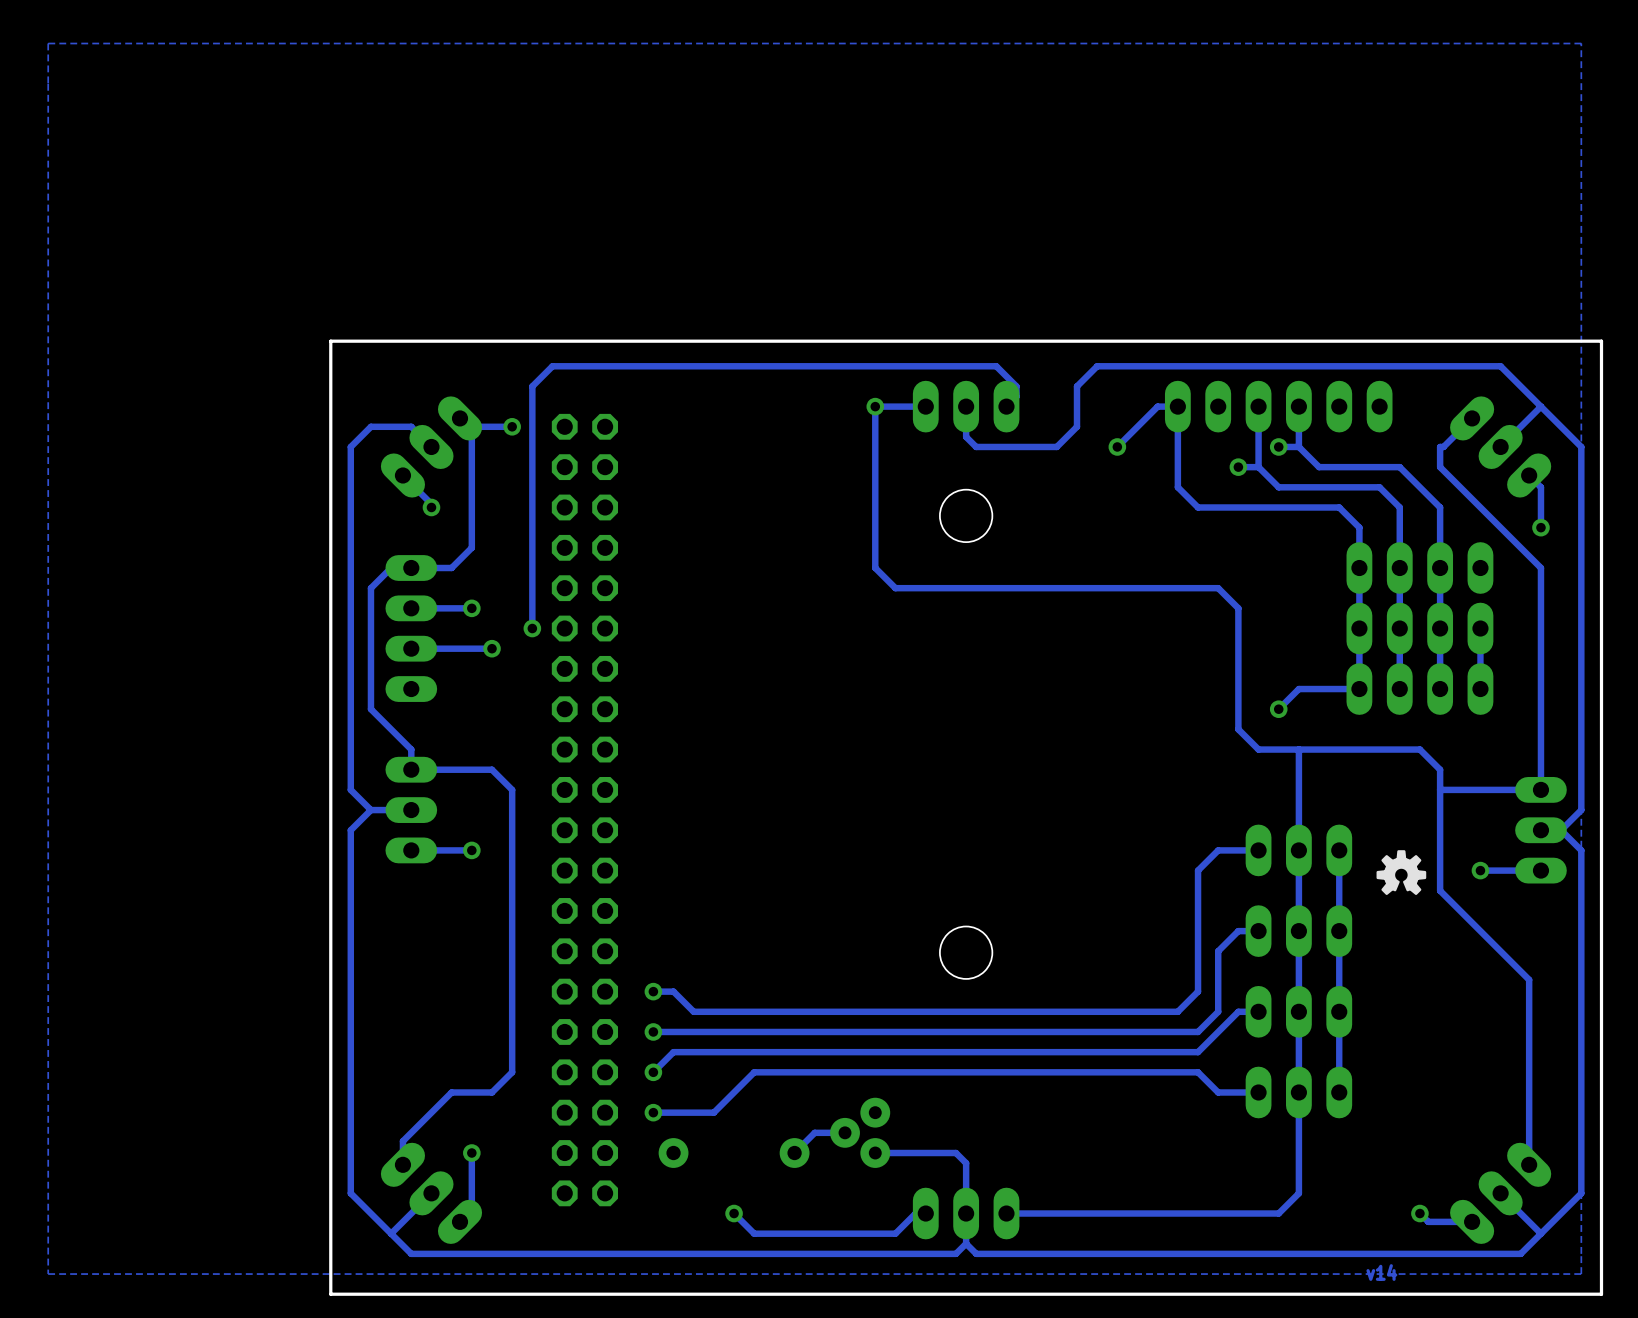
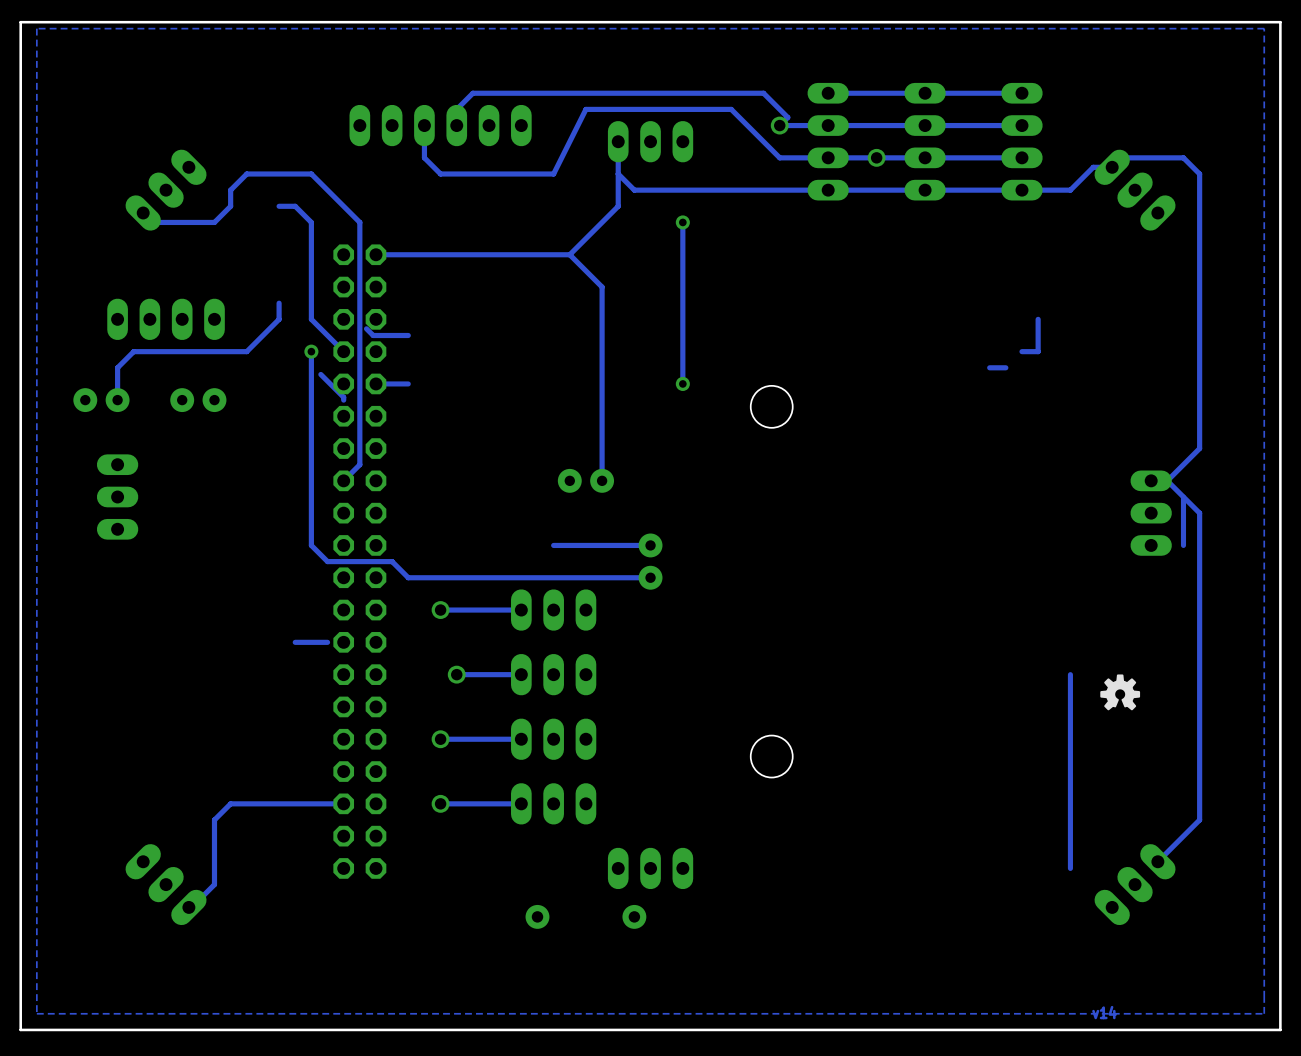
track: none -> (1021, 93) (828, 93)
track: none -> (424, 125) (424, 157) (440, 174) (553, 174) (585, 109) (731, 109) (779, 157) (1021, 157)
part: none -> (440, 125)
via: none -> (779, 125)
track: none -> (1021, 125) (779, 125) (787, 117) (763, 93) (472, 93) (456, 109) (456, 125)
track: none -> (618, 141) (618, 206) (569, 254)
part: none -> (650, 141)
part: none -> (828, 141)
part: none -> (925, 141)
part: none -> (1021, 141)
via: none -> (876, 157)
track: none -> (618, 174) (634, 190) (1070, 190) (1093, 167) (1112, 167) (1118, 160) (1118, 157) (1183, 157) (1199, 174) (1199, 448) (1167, 480) (1199, 513) (1199, 819) (1157, 861)
track: none -> (143, 212) (152, 222) (214, 222) (230, 206) (230, 190) (246, 174) (311, 174) (359, 222) (359, 464) (343, 480)
track: none -> (682, 222) (682, 383)
via: none -> (682, 222)
track: none -> (569, 254) (375, 254)
track: none -> (569, 254) (602, 287) (602, 480)
board edge: (1601, 341) (330, 341) (330, 1294) -> (1280, 266) (1280, 22) (20, 22) (20, 1029) (263, 1029)
track: none -> (279, 303) (279, 319) (246, 351) (133, 351) (117, 367) (117, 400)
via: (875, 406) -> none
track: (925, 406) (875, 406) (875, 568) (895, 588) (1218, 588) (1238, 608) (1238, 729) (1258, 749) (1419, 749) (1440, 769) (1440, 890) (1529, 979) (1529, 1164) -> none
track: (966, 406) (966, 436) (976, 446) (1056, 446) (1077, 426) (1077, 386) (1097, 366) (1500, 366) (1581, 446) (1581, 810) (1561, 830) -> none
part: (966, 406) -> none
track: (1006, 406) (1016, 396) (1016, 386) (996, 366) (552, 366) (532, 386) (532, 628) -> none
track: (1258, 406) (1258, 467) (1278, 487) (1379, 487) (1399, 507) (1399, 689) -> none
part: (1278, 406) -> none
track: (1540, 406) (1500, 446) -> none
track: (1472, 418) (1443, 446) (1440, 446) (1440, 467) (1540, 568) (1540, 789) (1440, 789) -> none
track: (411, 426) (370, 426) (350, 446) (350, 789) (370, 810) (350, 830) (350, 1193) (411, 1253) (955, 1253) (966, 1243) -> (327, 335) (311, 319) (311, 222) (295, 206) (279, 206)
track: (471, 426) (471, 547) (451, 568) (391, 568) (370, 588) (370, 709) (411, 749) (411, 769) (492, 769) (512, 789) (512, 1072) (492, 1092) (451, 1092) (402, 1141) (402, 1164) -> none
via: (512, 426) -> none
track: none -> (311, 351) (311, 545) (327, 561) (392, 561) (408, 577) (650, 577)
via: none -> (311, 351)
part position: (431, 446) -> (166, 190)
track: (1117, 446) (1157, 406) (1177, 406) (1177, 487) (1198, 507) (1339, 507) (1359, 527) (1359, 689) (1298, 689) (1278, 709) -> none
via: (1117, 446) -> none
via: (1278, 446) -> none
track: (1298, 446) (1319, 467) (1399, 467) (1440, 507) (1440, 689) -> none
part position: (1500, 446) -> (1135, 190)
via: (1238, 467) -> none
track: (1529, 475) (1540, 487) (1540, 527) -> none
track: none -> (408, 383) (375, 383)
via: none -> (682, 383)
part: none -> (101, 400)
part: none -> (198, 400)
via: (431, 507) -> none
via: (1540, 527) -> none
part: (1419, 568) -> none
track: (471, 608) (411, 608) -> none
via: (471, 608) -> none
part: none -> (585, 480)
part: none -> (117, 497)
part rotation: 0° (411, 628) -> 90° clockwise (166, 319)
part position: (411, 628) -> (166, 319)
via: (532, 628) -> none
part: (1419, 628) -> none
track: (492, 648) (411, 648) -> (521, 674) (456, 674)
via: (492, 648) -> none
part: none -> (1151, 513)
track: none -> (650, 545) (553, 545)
part: (1419, 689) -> none
part: none -> (650, 561)
via: (1278, 709) -> none
track: (1298, 749) (1298, 1193) (1278, 1213) (1006, 1213) -> none
via: none -> (440, 610)
track: none -> (521, 610) (440, 610)
part: none -> (553, 610)
part: (411, 810) -> none
part position: (584, 810) -> (359, 561)
part: (1540, 830) -> none
track: (1561, 830) (1581, 850) (1581, 1193) (1520, 1253) (976, 1253) (966, 1243) -> none
track: (471, 850) (411, 850) -> none
via: (471, 850) -> none
via: none -> (456, 674)
part: none -> (553, 674)
track: (1258, 850) (1218, 850) (1198, 870) (1198, 991) (1177, 1011) (693, 1011) (673, 991) (653, 991) -> none
part: (1298, 850) -> none
via: (1480, 870) -> none
track: (1540, 870) (1480, 870) -> none
via: none -> (440, 739)
track: none -> (521, 739) (440, 739)
part: none -> (553, 739)
track: (1258, 931) (1238, 931) (1218, 951) (1218, 1011) (1198, 1031) (653, 1031) -> none
part: (1298, 931) -> none
via: (653, 991) -> none
track: none -> (343, 803) (230, 803) (214, 819) (214, 884) (191, 907) (188, 907)
via: none -> (440, 803)
track: none -> (521, 803) (440, 803)
part: none -> (553, 803)
track: (1258, 1011) (1238, 1011) (1198, 1052) (673, 1052) (653, 1072) -> none
part: (1298, 1011) -> none
via: (653, 1031) -> none
via: (653, 1072) -> none
part: none -> (650, 868)
track: (1258, 1092) (1218, 1092) (1198, 1072) (754, 1072) (713, 1112) (653, 1112) -> none
part: (1298, 1092) -> none
via: (653, 1112) -> none
track: (845, 1132) (814, 1132) (794, 1153) -> none
part: (860, 1132) -> none
track: (471, 1153) (471, 1213) (468, 1213) (460, 1221) (463, 1221) -> none
via: (471, 1153) -> none
track: (875, 1153) (955, 1153) (966, 1163) (966, 1243) -> none
track: (431, 1193) (391, 1233) -> none
part position: (431, 1193) -> (166, 884)
track: (1500, 1193) (1540, 1233) -> none
part position: (1500, 1193) -> (1135, 884)
via: (734, 1213) -> none
track: (925, 1213) (915, 1213) (895, 1233) (754, 1233) (734, 1213) -> none
part: (966, 1213) -> none
track: (1419, 1213) (1428, 1221) (1472, 1221) -> none
via: (1419, 1213) -> none

